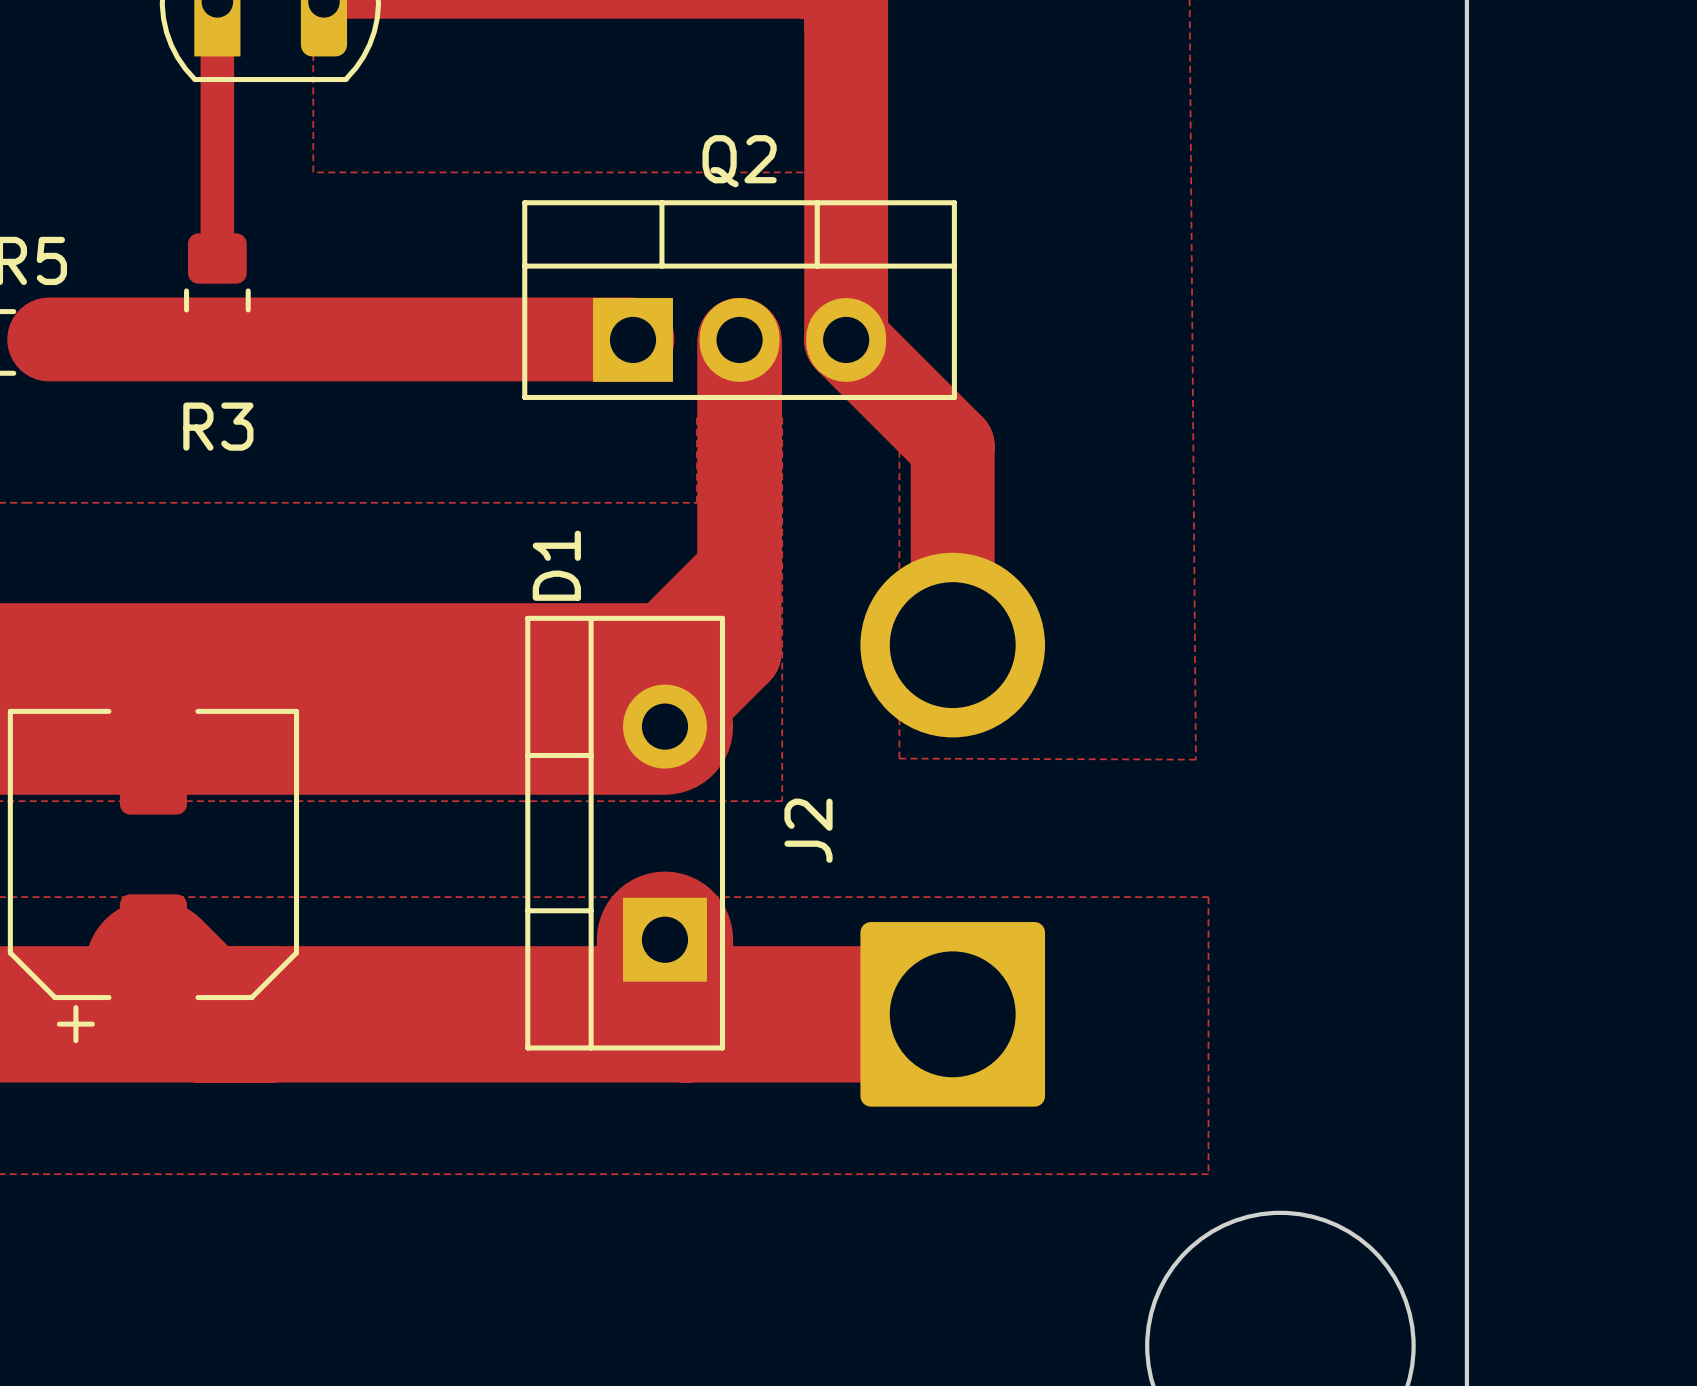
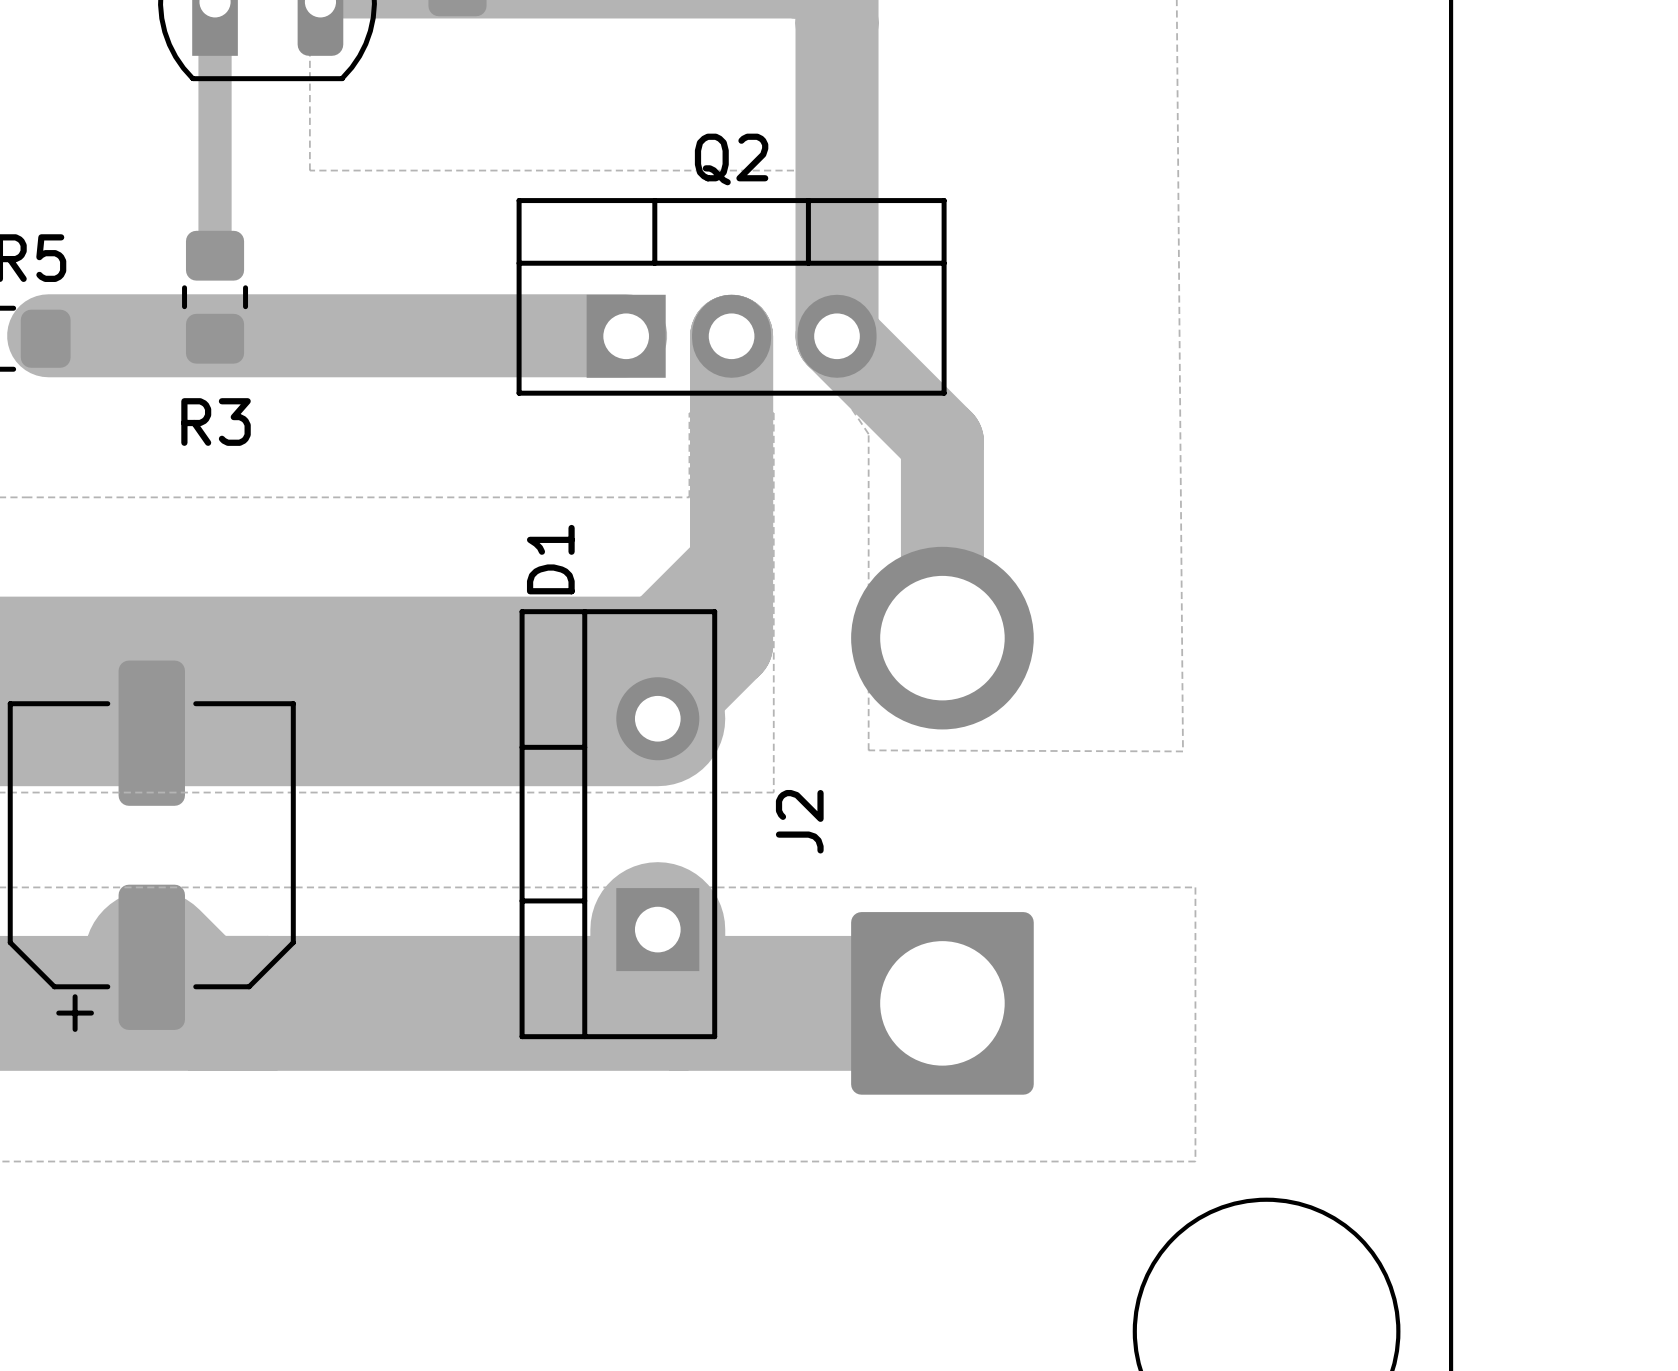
zone outline: (814, 342) (899, 438) (899, 758) (1195, 759) -> (805, 339) (868, 434) (868, 750) (1183, 751)

